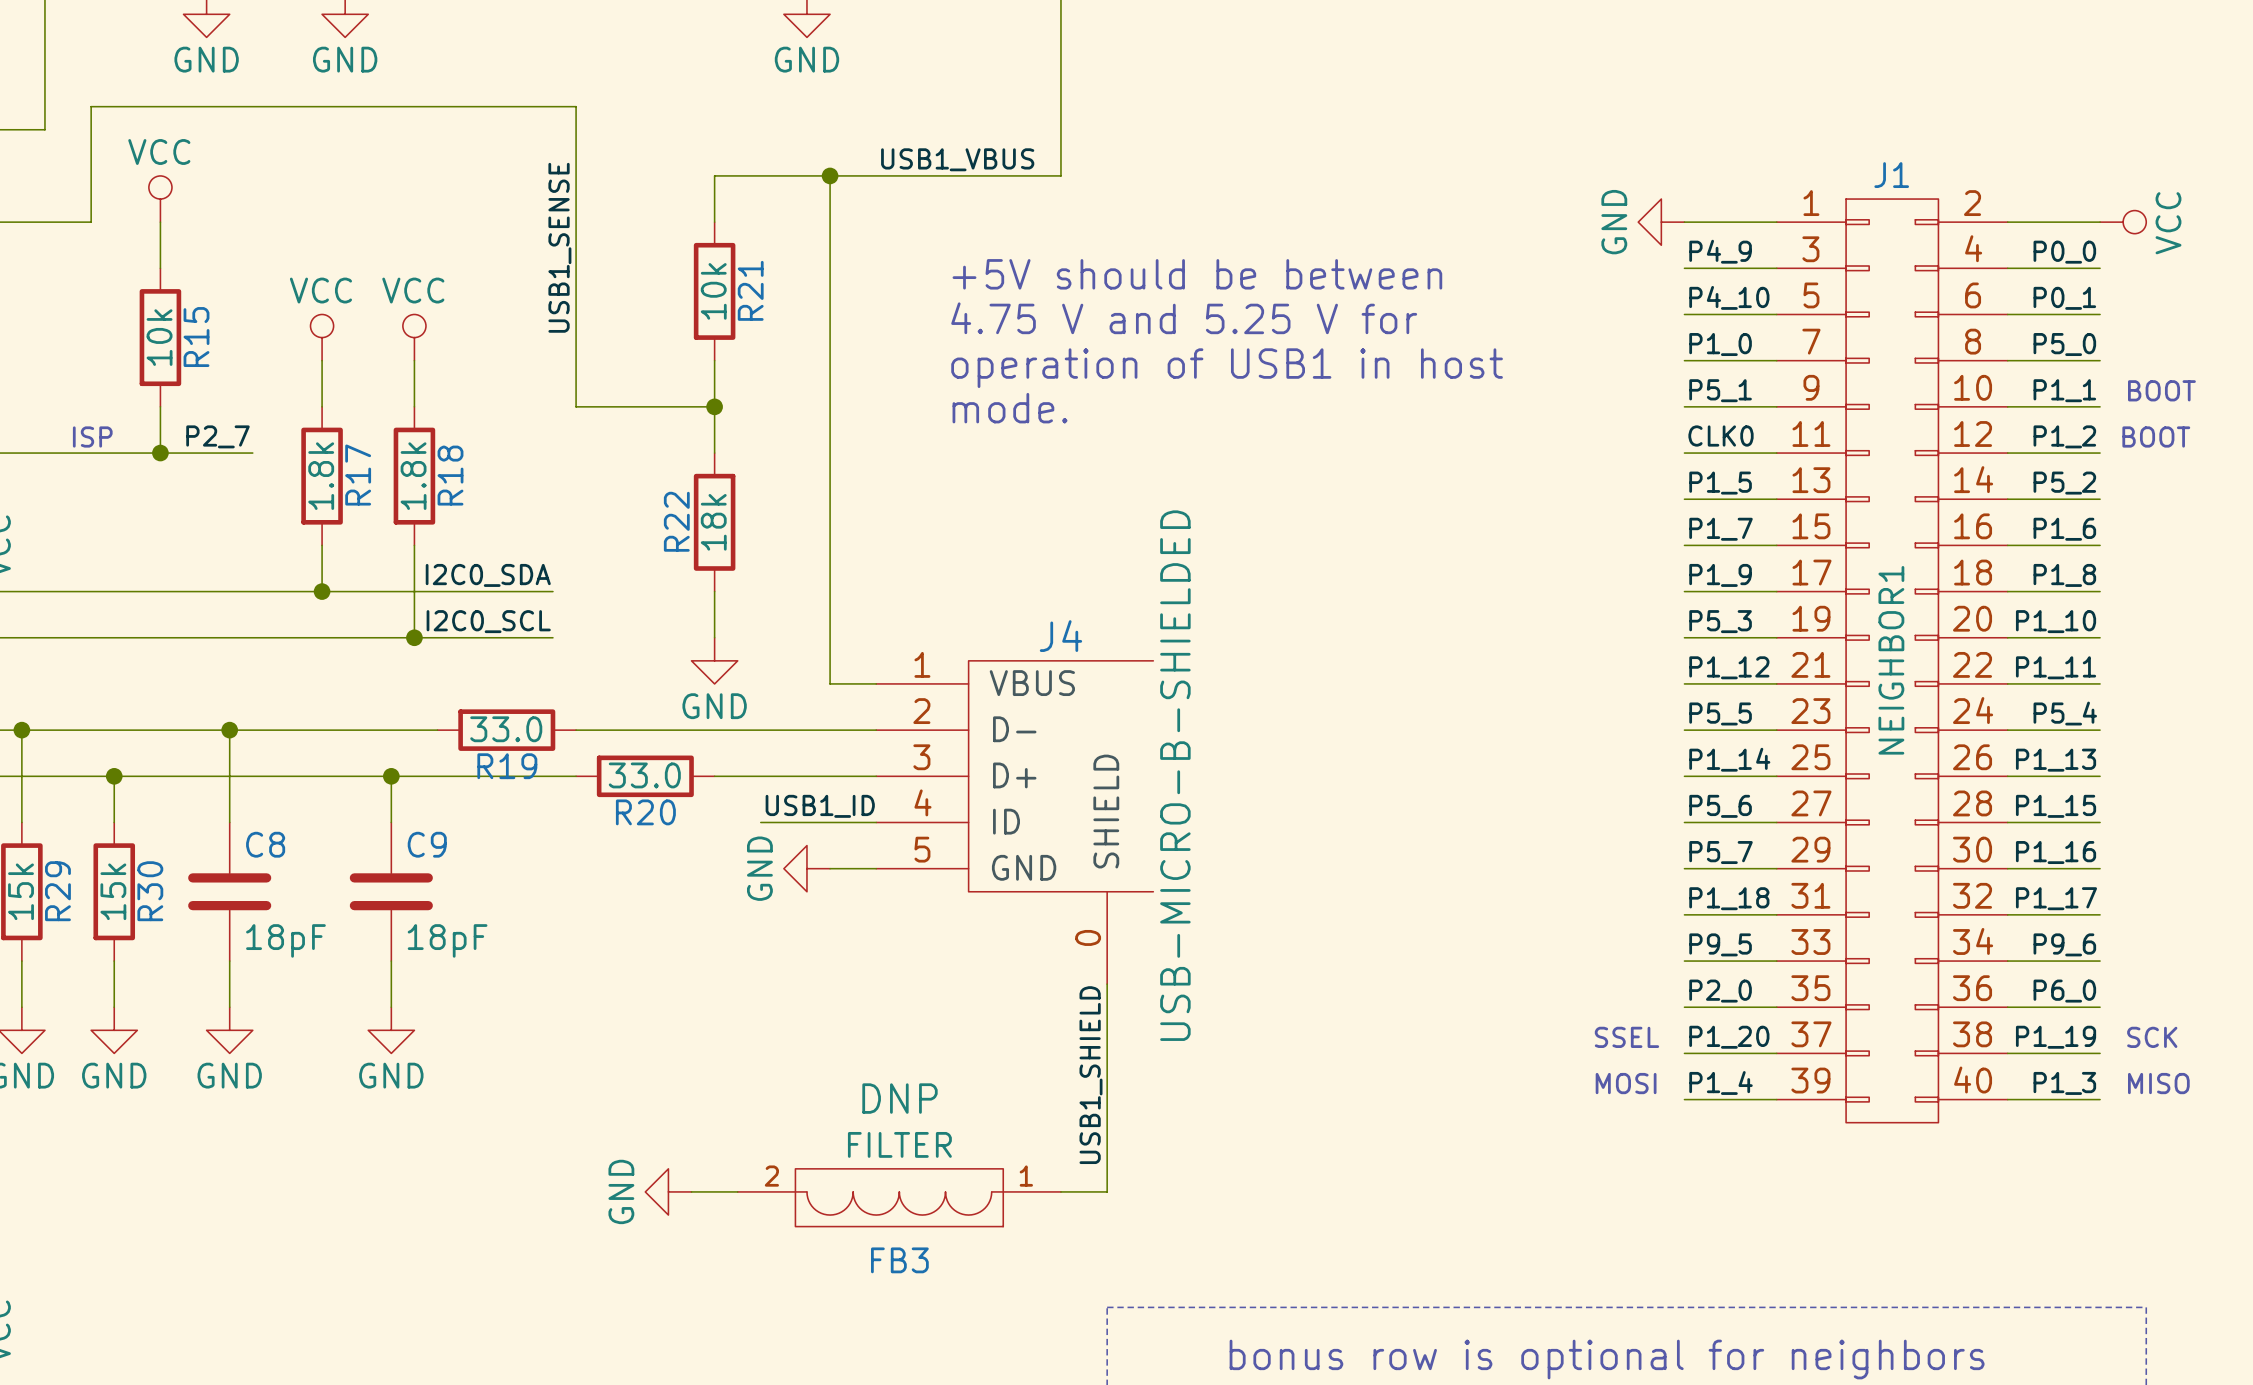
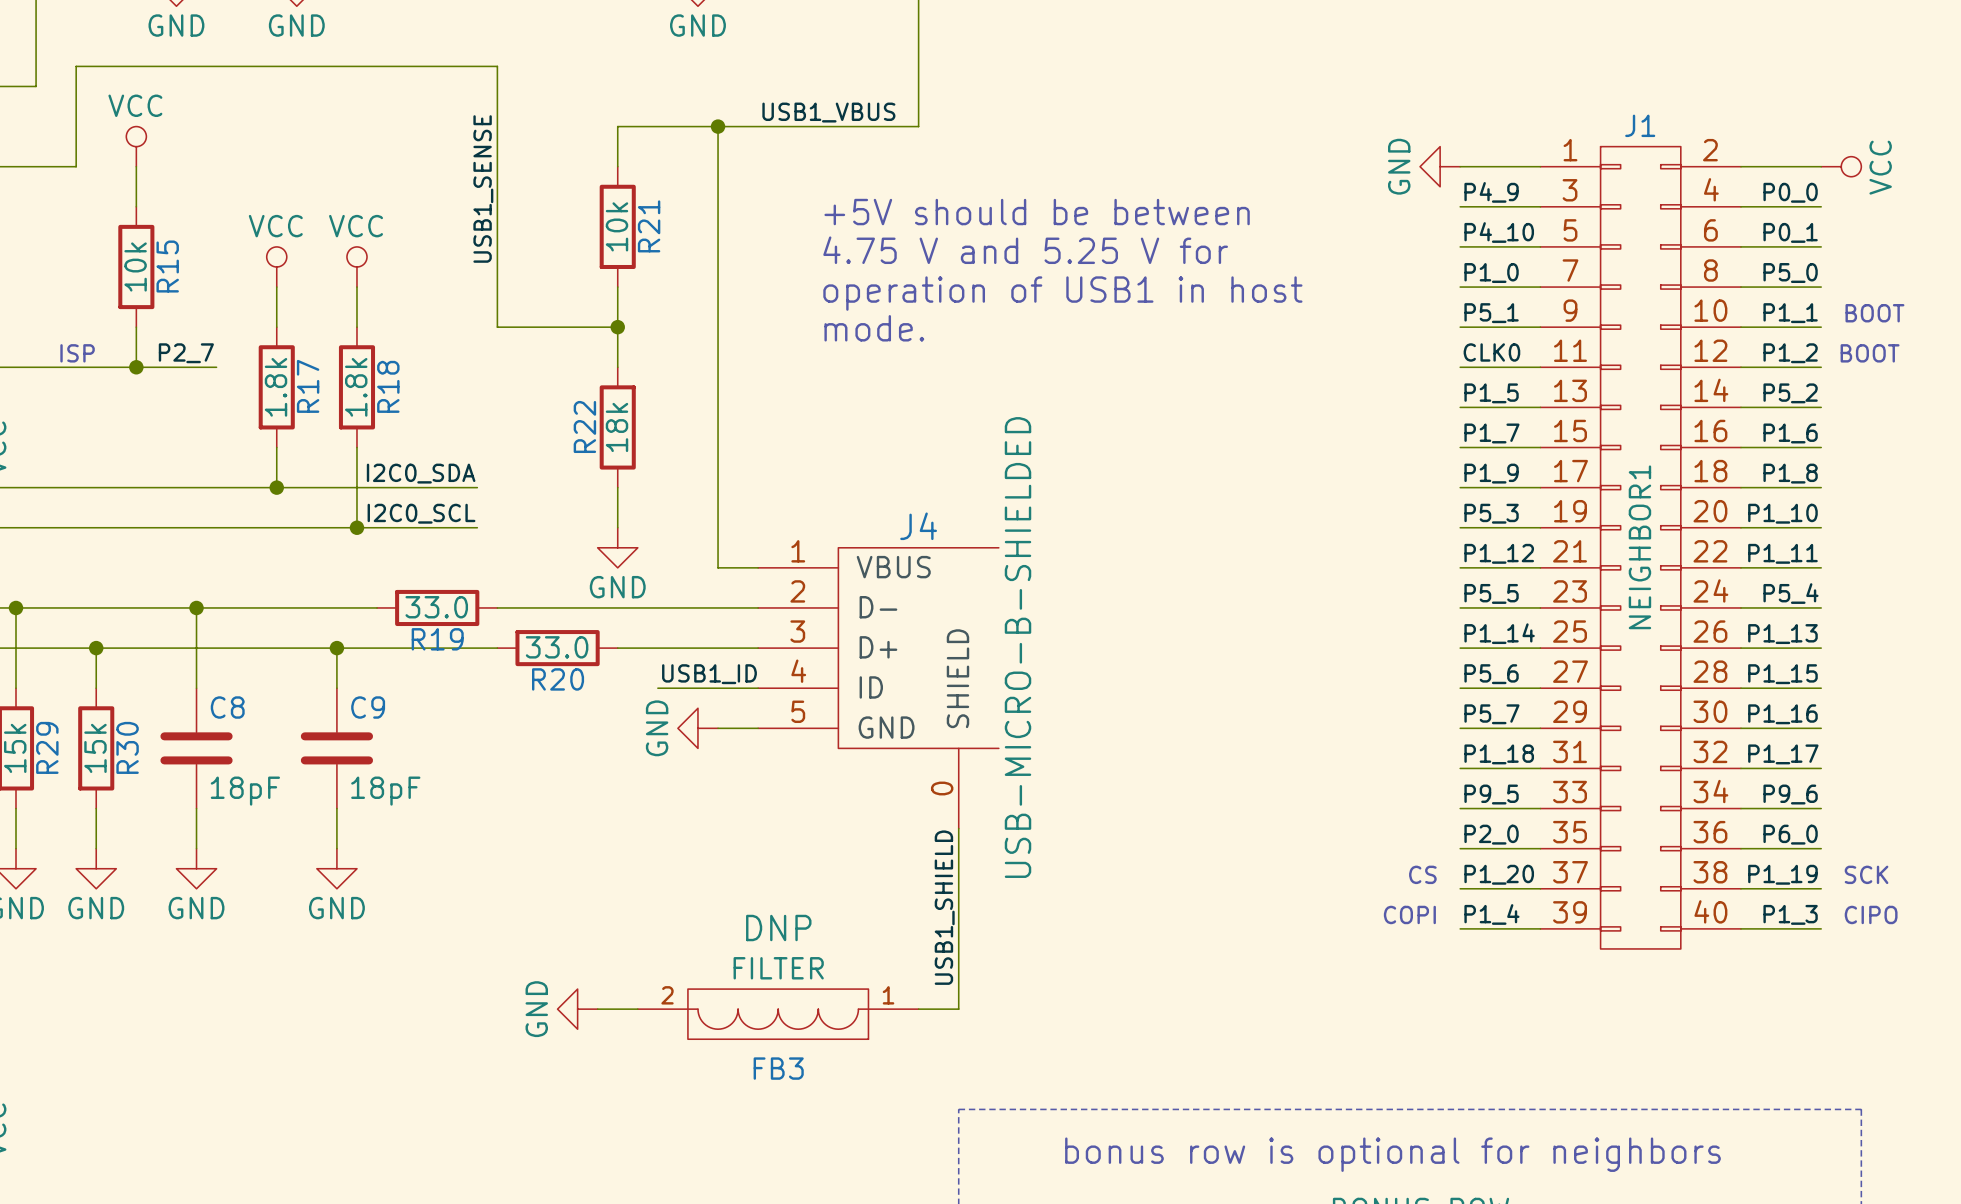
text: SSEL (1626, 1037) -> CS (1422, 874)
text: MOSI (1626, 1083) -> COPI (1409, 914)
text: MISO (2158, 1083) -> CIPO (1871, 914)

